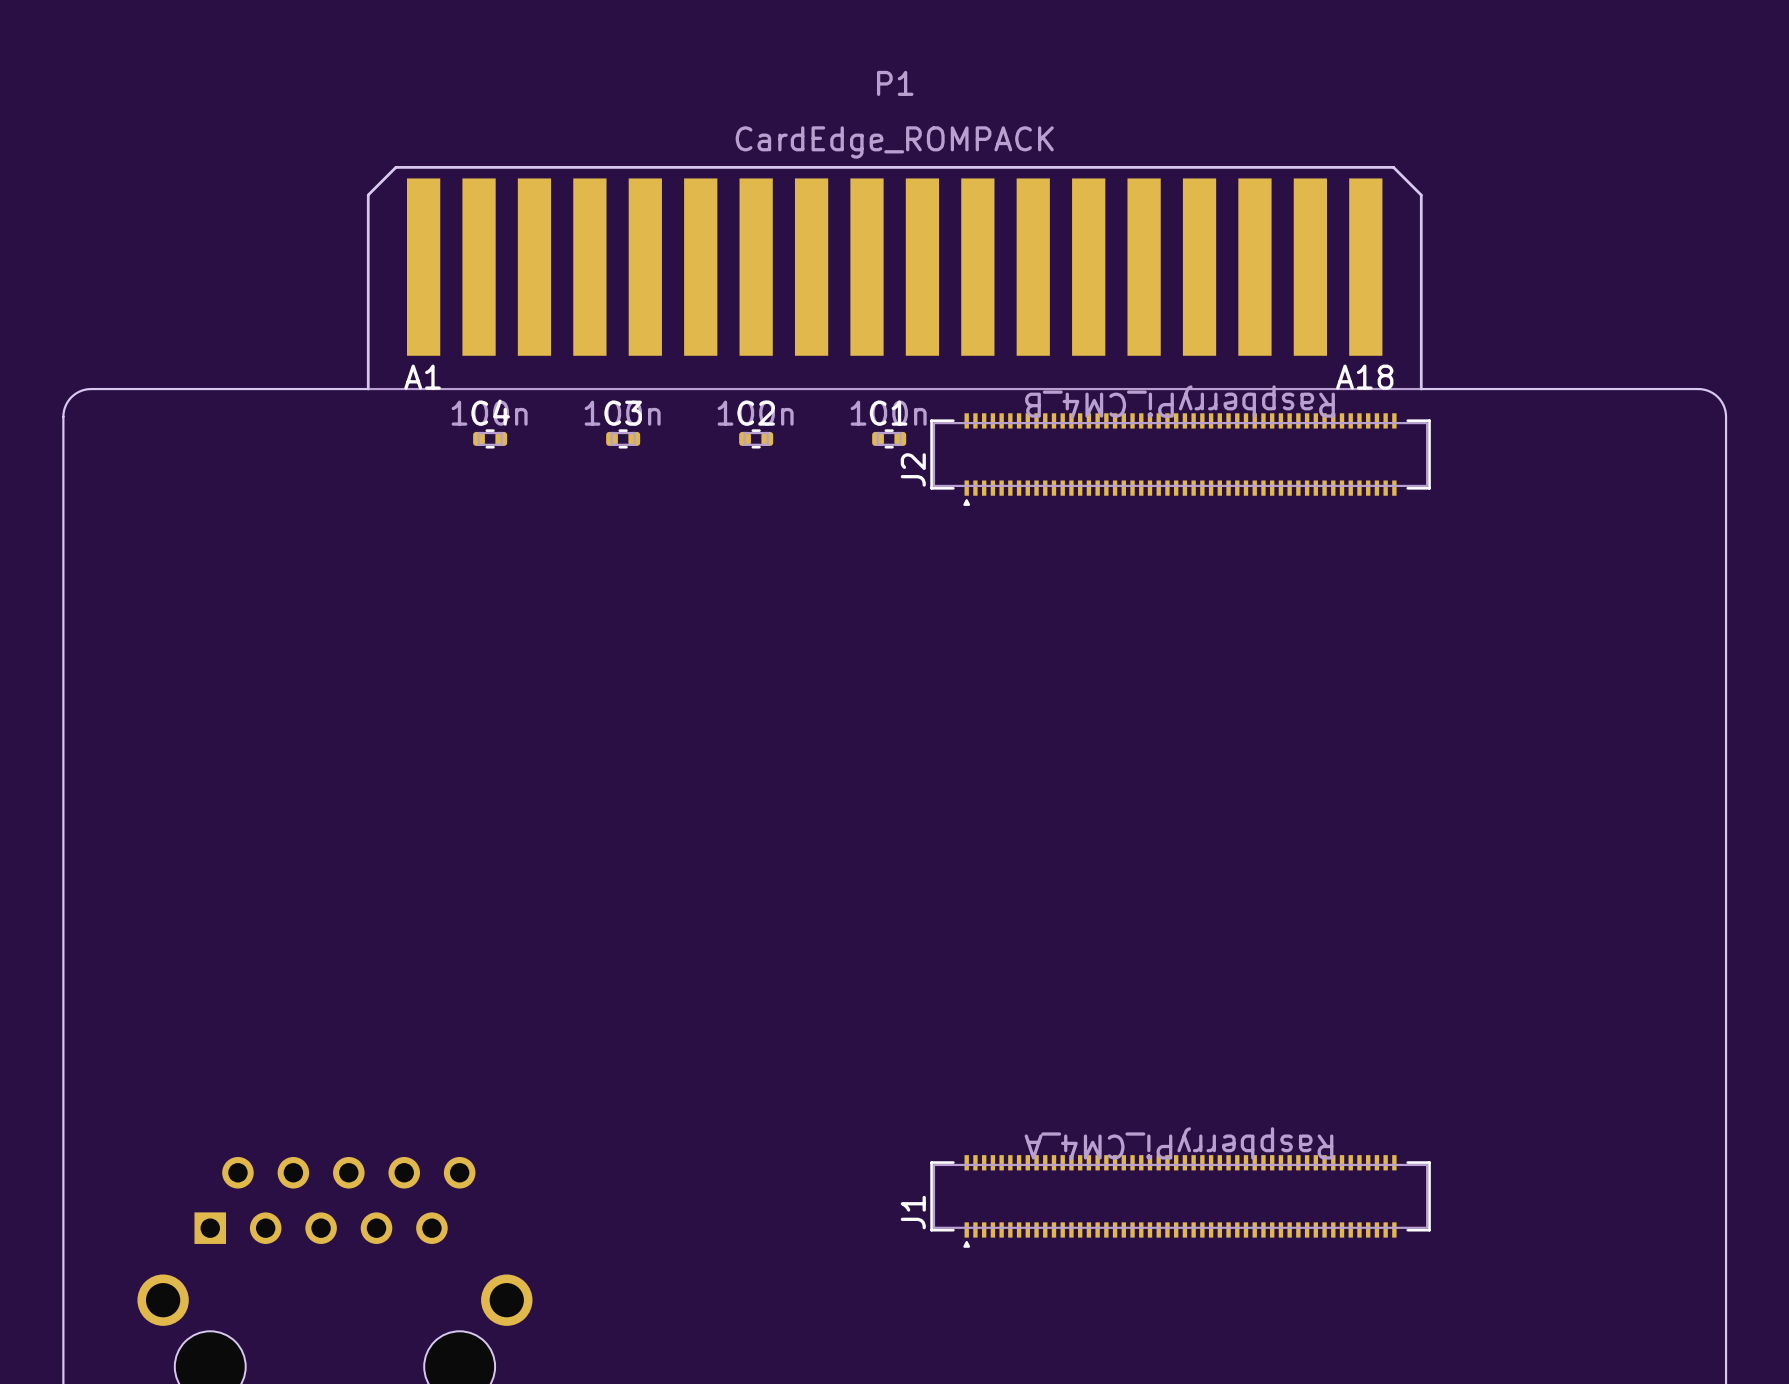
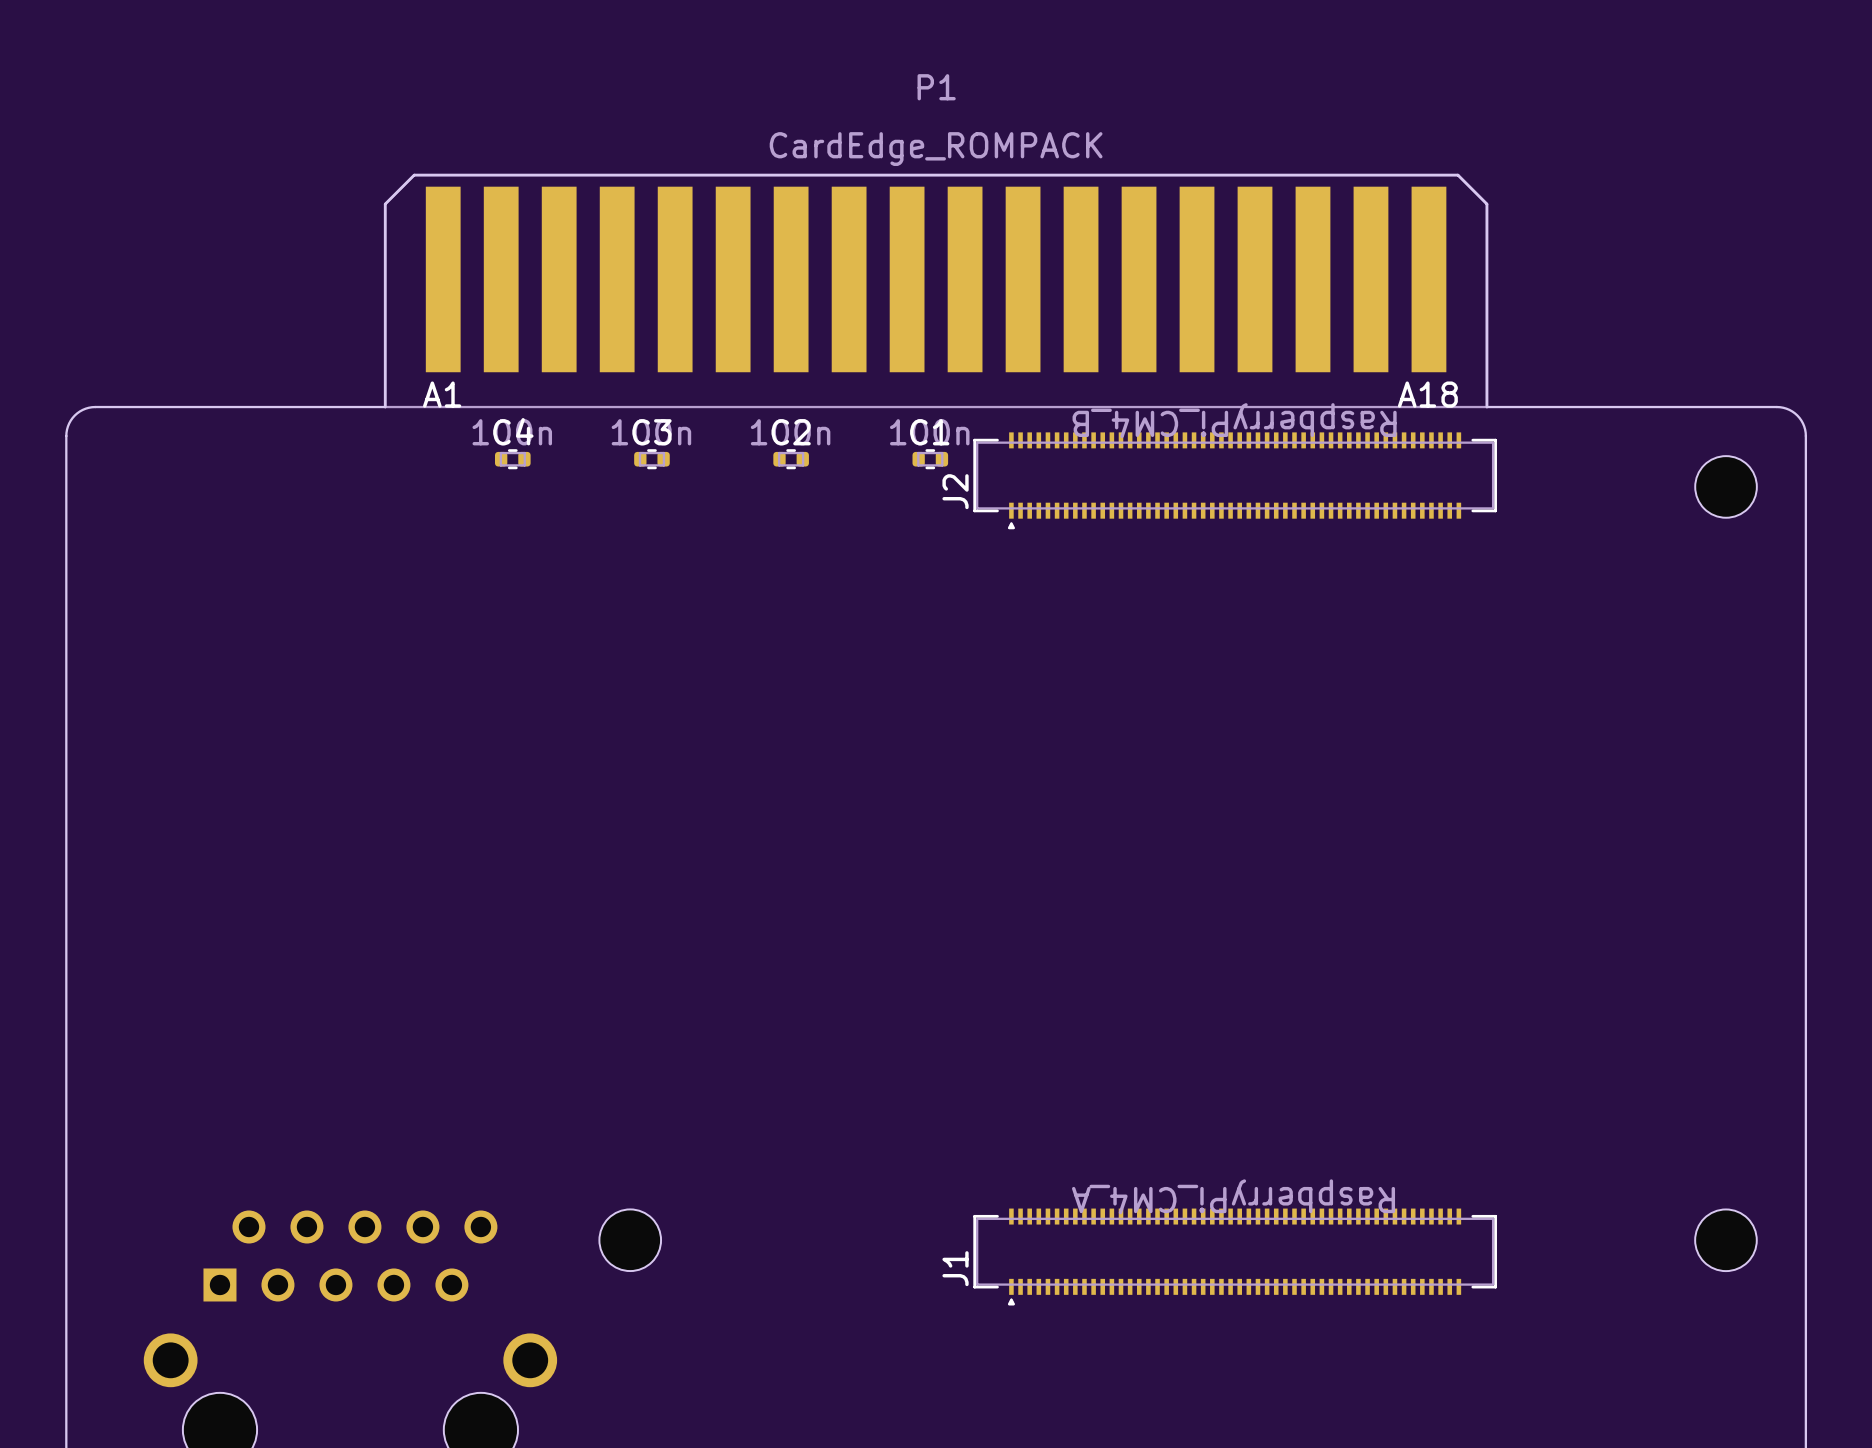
part: none -> (1726, 486)
part: none -> (630, 1240)
part: none -> (1725, 1240)

